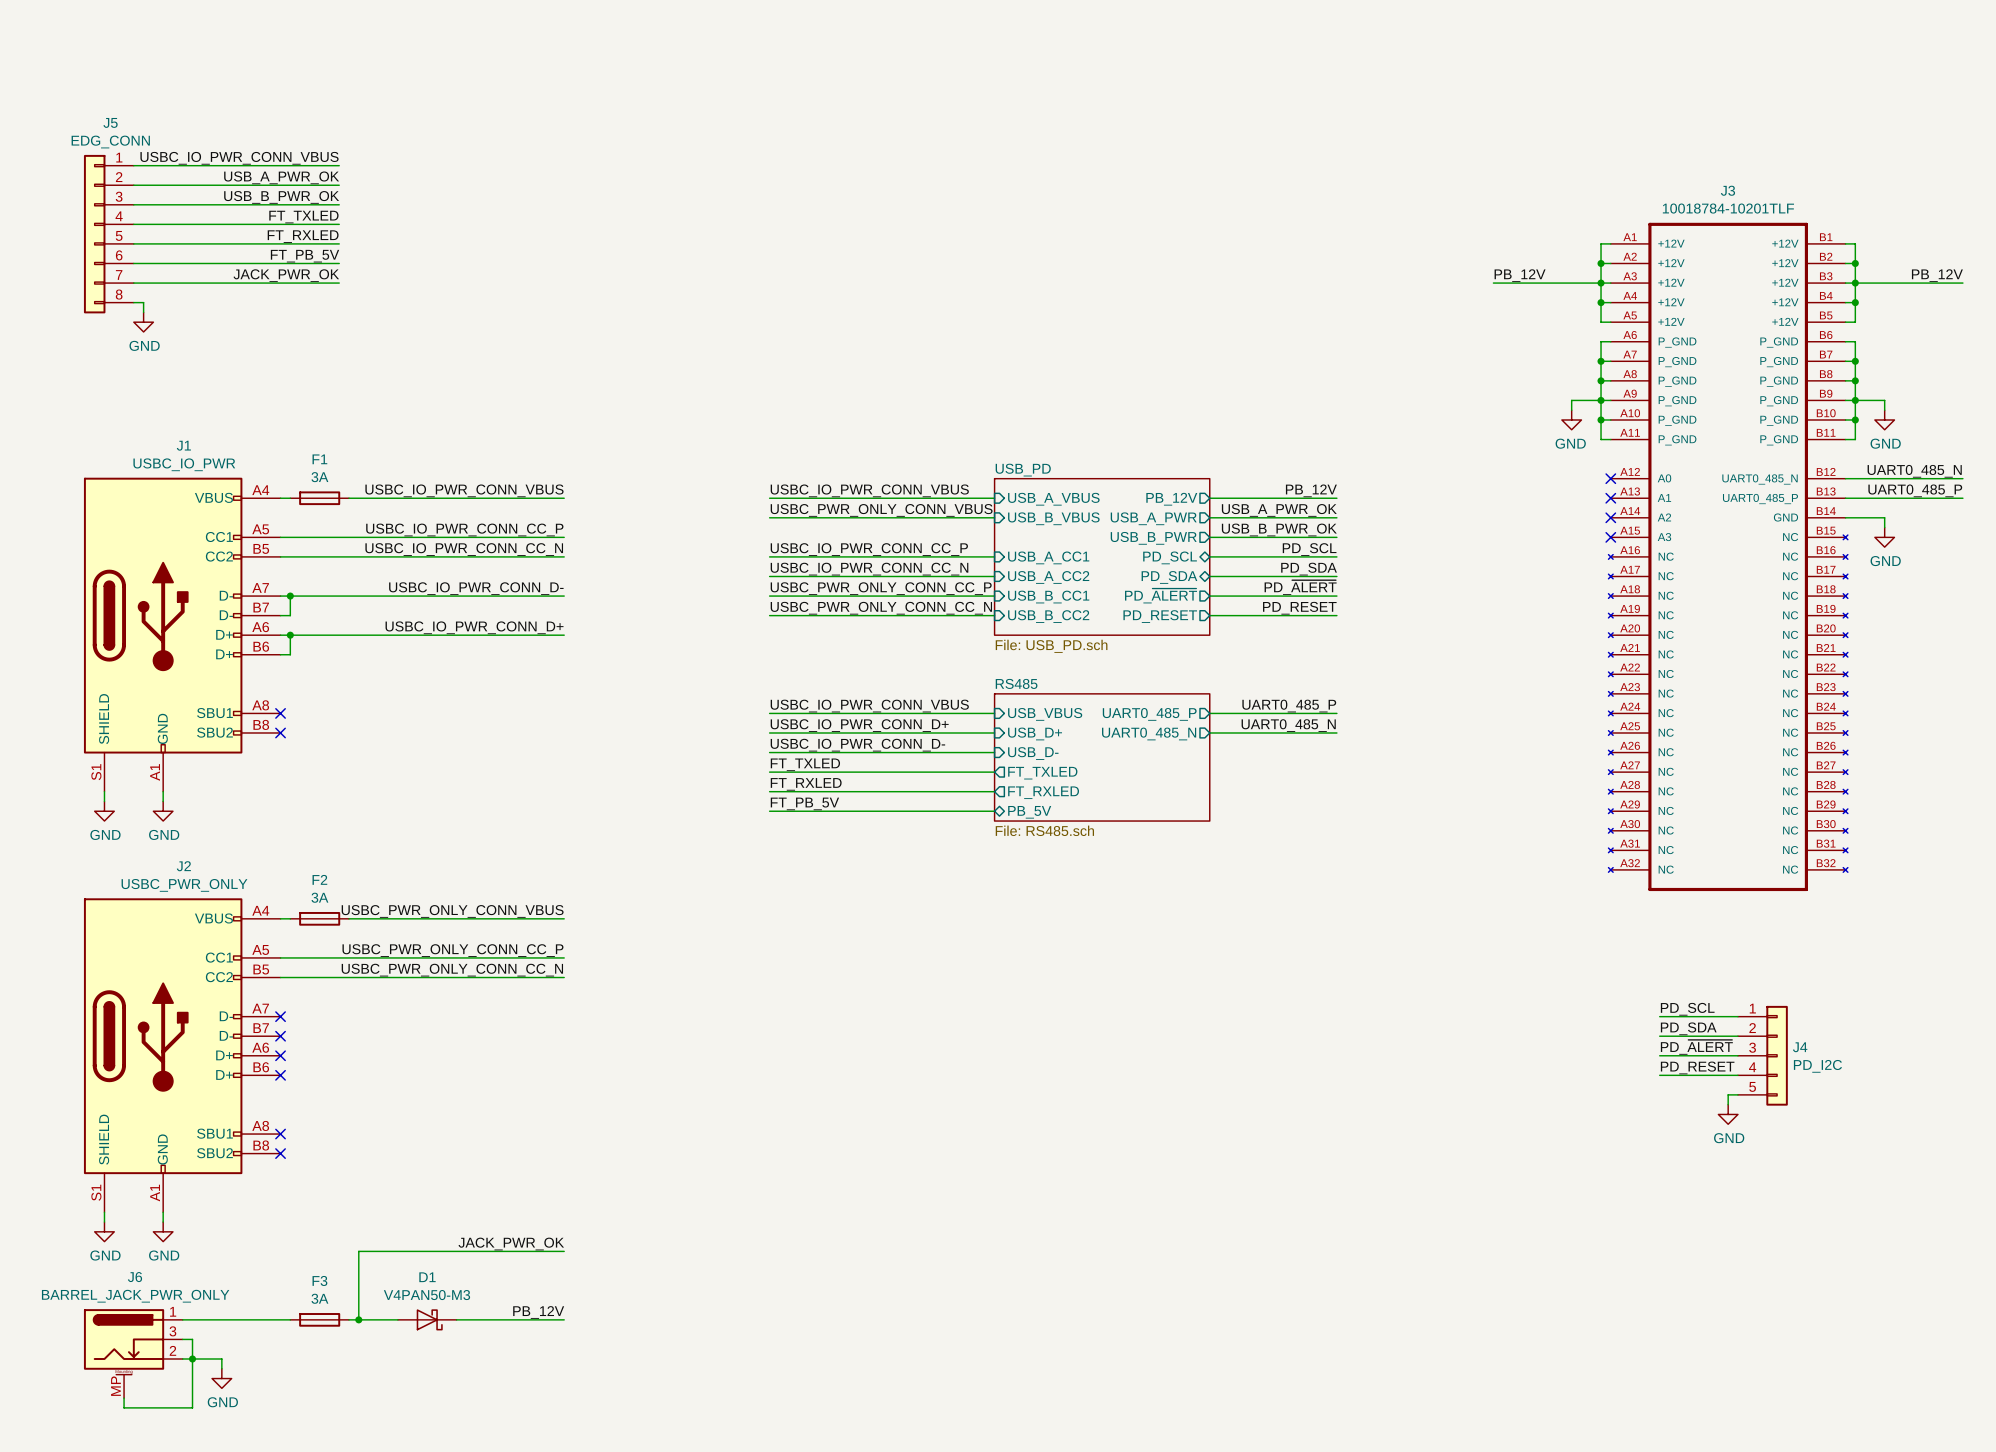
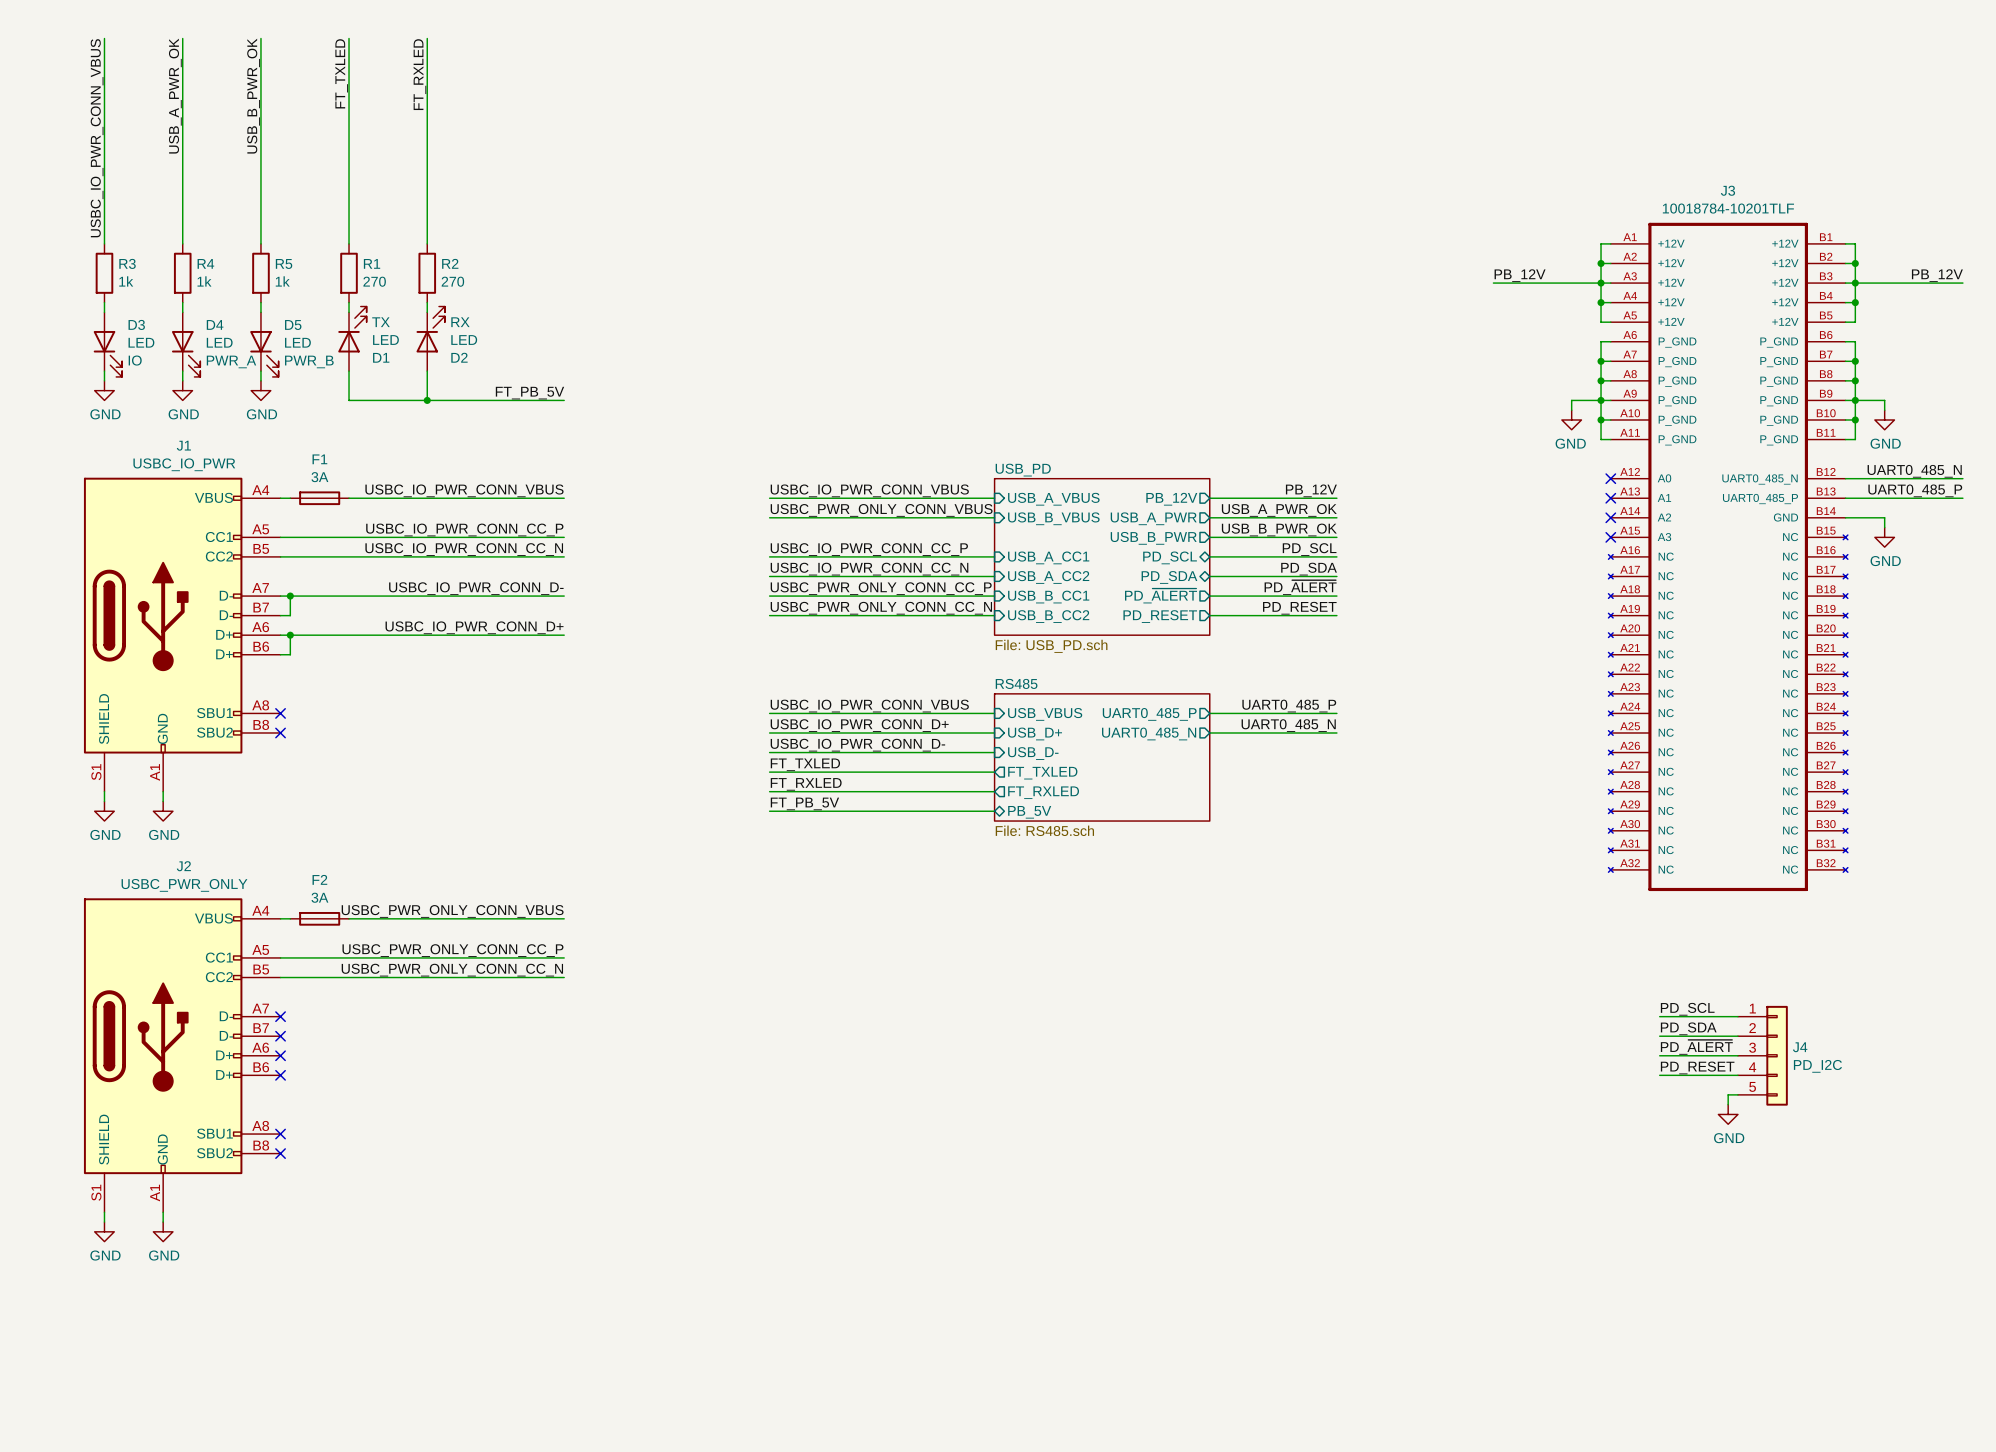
wire: none -> (104, 38) (104, 243)
wire: none -> (182, 38) (182, 243)
wire: none -> (260, 38) (260, 243)
wire: none -> (349, 38) (349, 243)
wire: none -> (427, 38) (427, 243)
label: none -> FT_RXLED (419, 74)
label: none -> USB_A_PWR_OK (175, 96)
label: none -> USBC_IO_PWR_CONN_VBUS (97, 138)
label: USBC_IO_PWR_CONN_VBUS (239, 158) -> none
wire: (133, 165) (339, 165) -> none
label: USB_A_PWR_OK (281, 177) -> none
wire: (133, 185) (339, 185) -> none
label rotation: 0° (281, 197) -> 90° counterclockwise (253, 96)
wire: (133, 204) (339, 204) -> none
label rotation: 0° (303, 217) -> 90° counterclockwise (341, 73)
label position: FT_TXLED (303, 217) -> FT_TXLED (341, 73)
wire: (133, 224) (339, 224) -> none
J5: EDG_CONN (108, 234) -> none
label: FT_RXLED (303, 236) -> none
wire: (133, 243) (339, 243) -> none
label: FT_PB_5V (305, 256) -> none
wire: (133, 263) (339, 263) -> none
R3: none -> 1k (104, 273)
R4: none -> 1k (182, 273)
R5: none -> 1k (260, 273)
R1: none -> 270 (349, 273)
R2: none -> 270 (427, 273)
label: JACK_PWR_OK (286, 275) -> none
wire: (133, 283) (339, 283) -> none
wire: (133, 302) (143, 302) (143, 312) -> none
wire: none -> (182, 302) (182, 312)
wire: none -> (260, 302) (260, 312)
wire: none -> (349, 302) (349, 312)
wire: none -> (427, 302) (427, 312)
power symbol: GND (143, 322) -> none
D1 text: none -> TX (380, 322)
D2: none -> LED (430, 338)
D3: none -> LED (107, 344)
D4: none -> LED (186, 344)
D5: none -> LED (264, 344)
wire: none -> (104, 371) (104, 380)
wire: none -> (182, 371) (182, 380)
wire: none -> (260, 371) (260, 380)
wire: none -> (349, 371) (349, 400) (564, 400)
wire: none -> (427, 371) (427, 400)
power symbol: none -> GND (104, 390)
power symbol: none -> GND (182, 390)
power symbol: none -> GND (260, 390)
label: none -> FT_PB_5V (529, 393)
junction: none -> (427, 400)
label: JACK_PWR_OK (511, 1244) -> none
wire: (564, 1251) (358, 1251) (358, 1319) -> none
D1 name position: D1 (427, 1277) -> D1 (381, 357)
D1 value: V4PAN50-M3 (426, 1295) -> LED (385, 340)
D1 symbol: [397, 1309, 457, 1331] -> [338, 306, 367, 372]
label: PB_12V (538, 1312) -> none
wire: (182, 1319) (290, 1319) -> none
F3: 3A (319, 1319) -> none
wire: (349, 1319) (397, 1319) -> none
junction: (358, 1319) -> none
wire: (456, 1319) (564, 1319) -> none
wire: (182, 1339) (192, 1339) (192, 1407) (124, 1407) (124, 1398) -> none
J6: BARREL_JACK_PWR_ONLY (133, 1353) -> none
wire: (182, 1358) (221, 1358) (221, 1368) -> none
junction: (192, 1358) -> none
power symbol: GND (221, 1378) -> none

